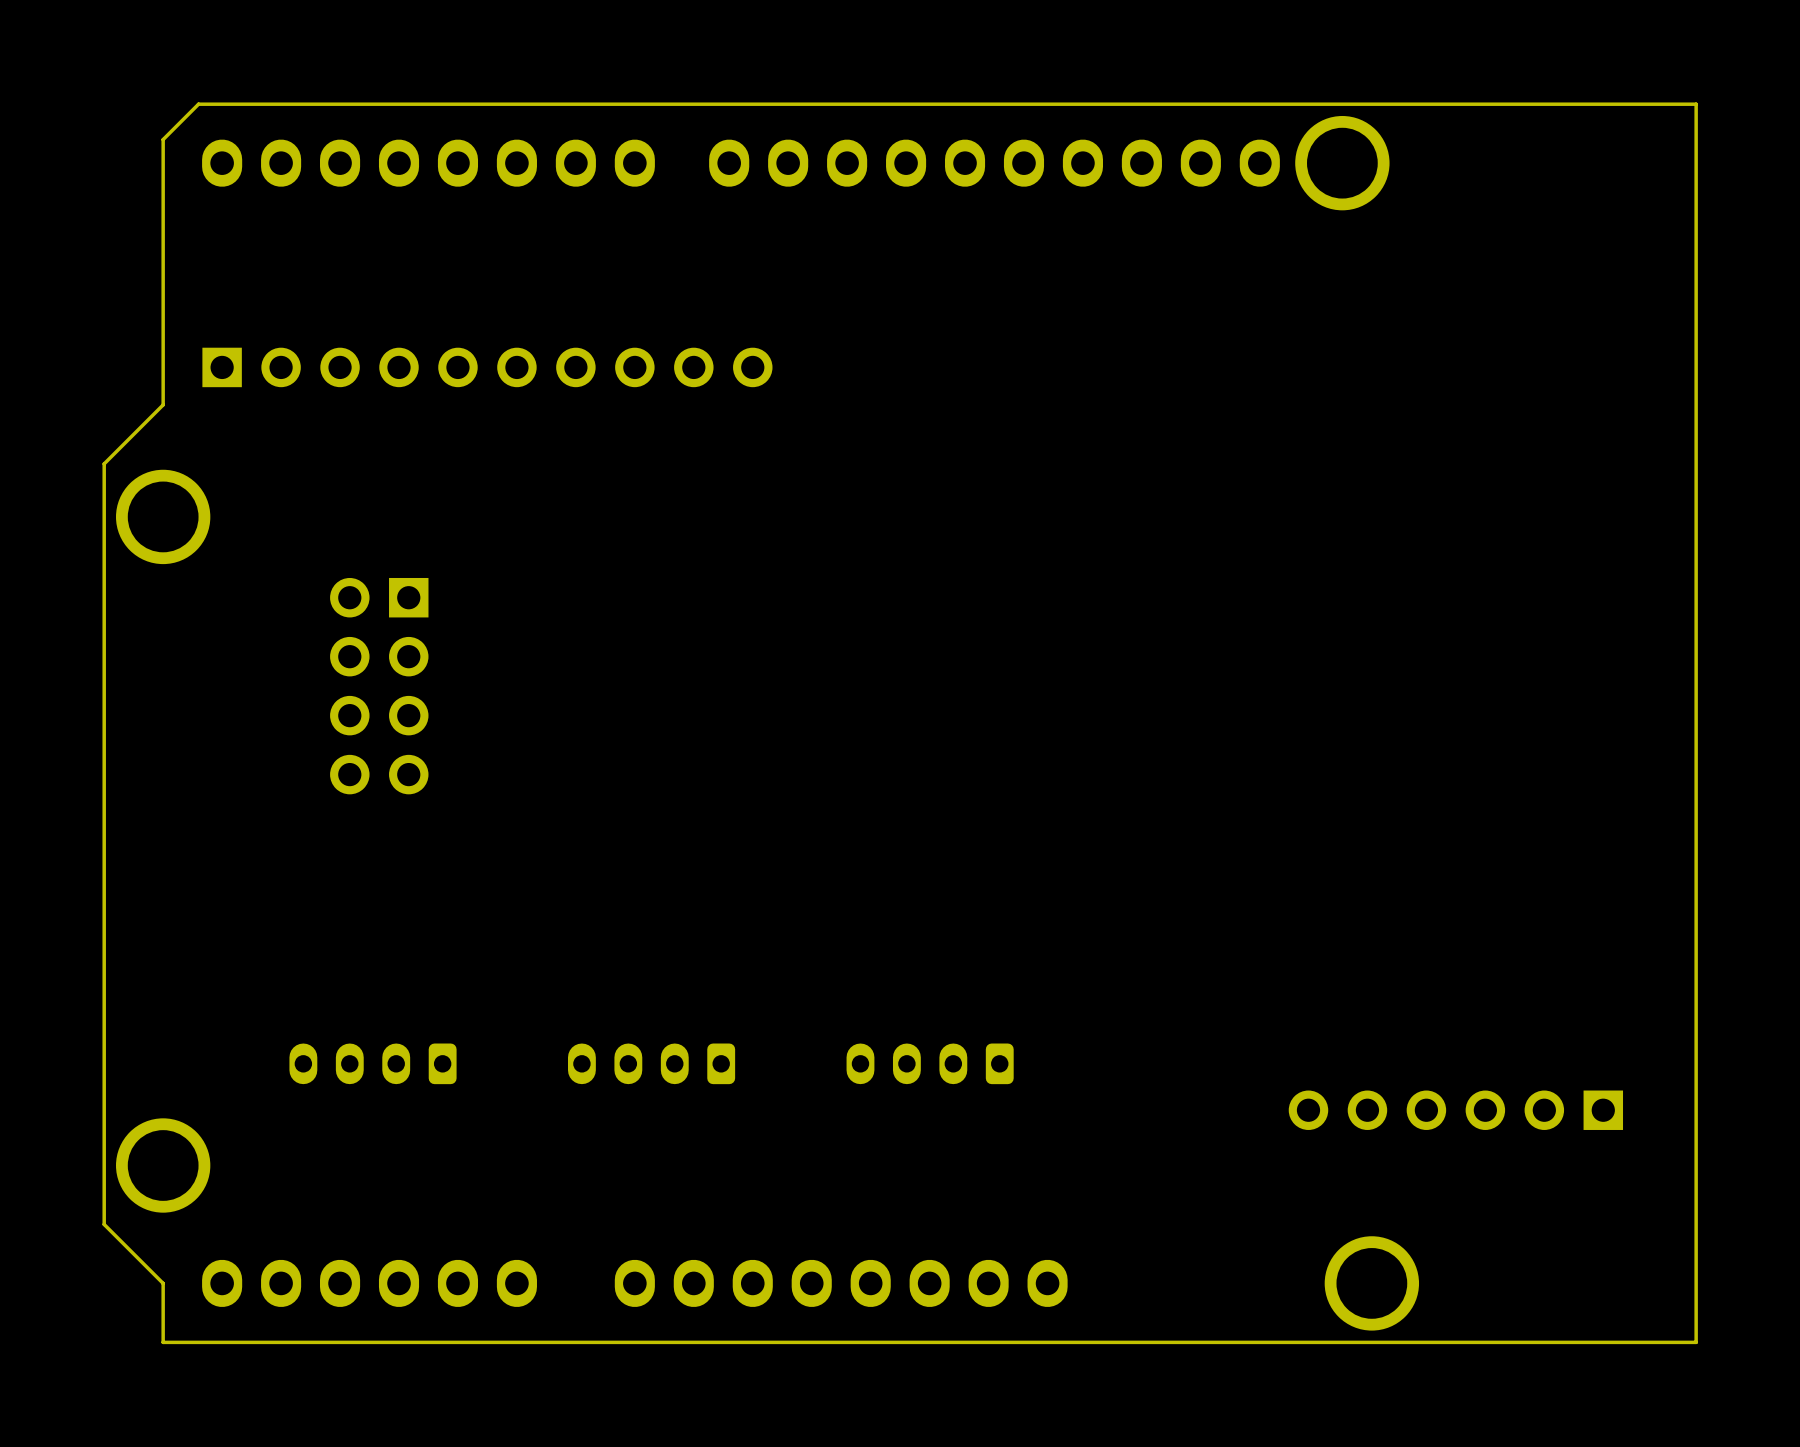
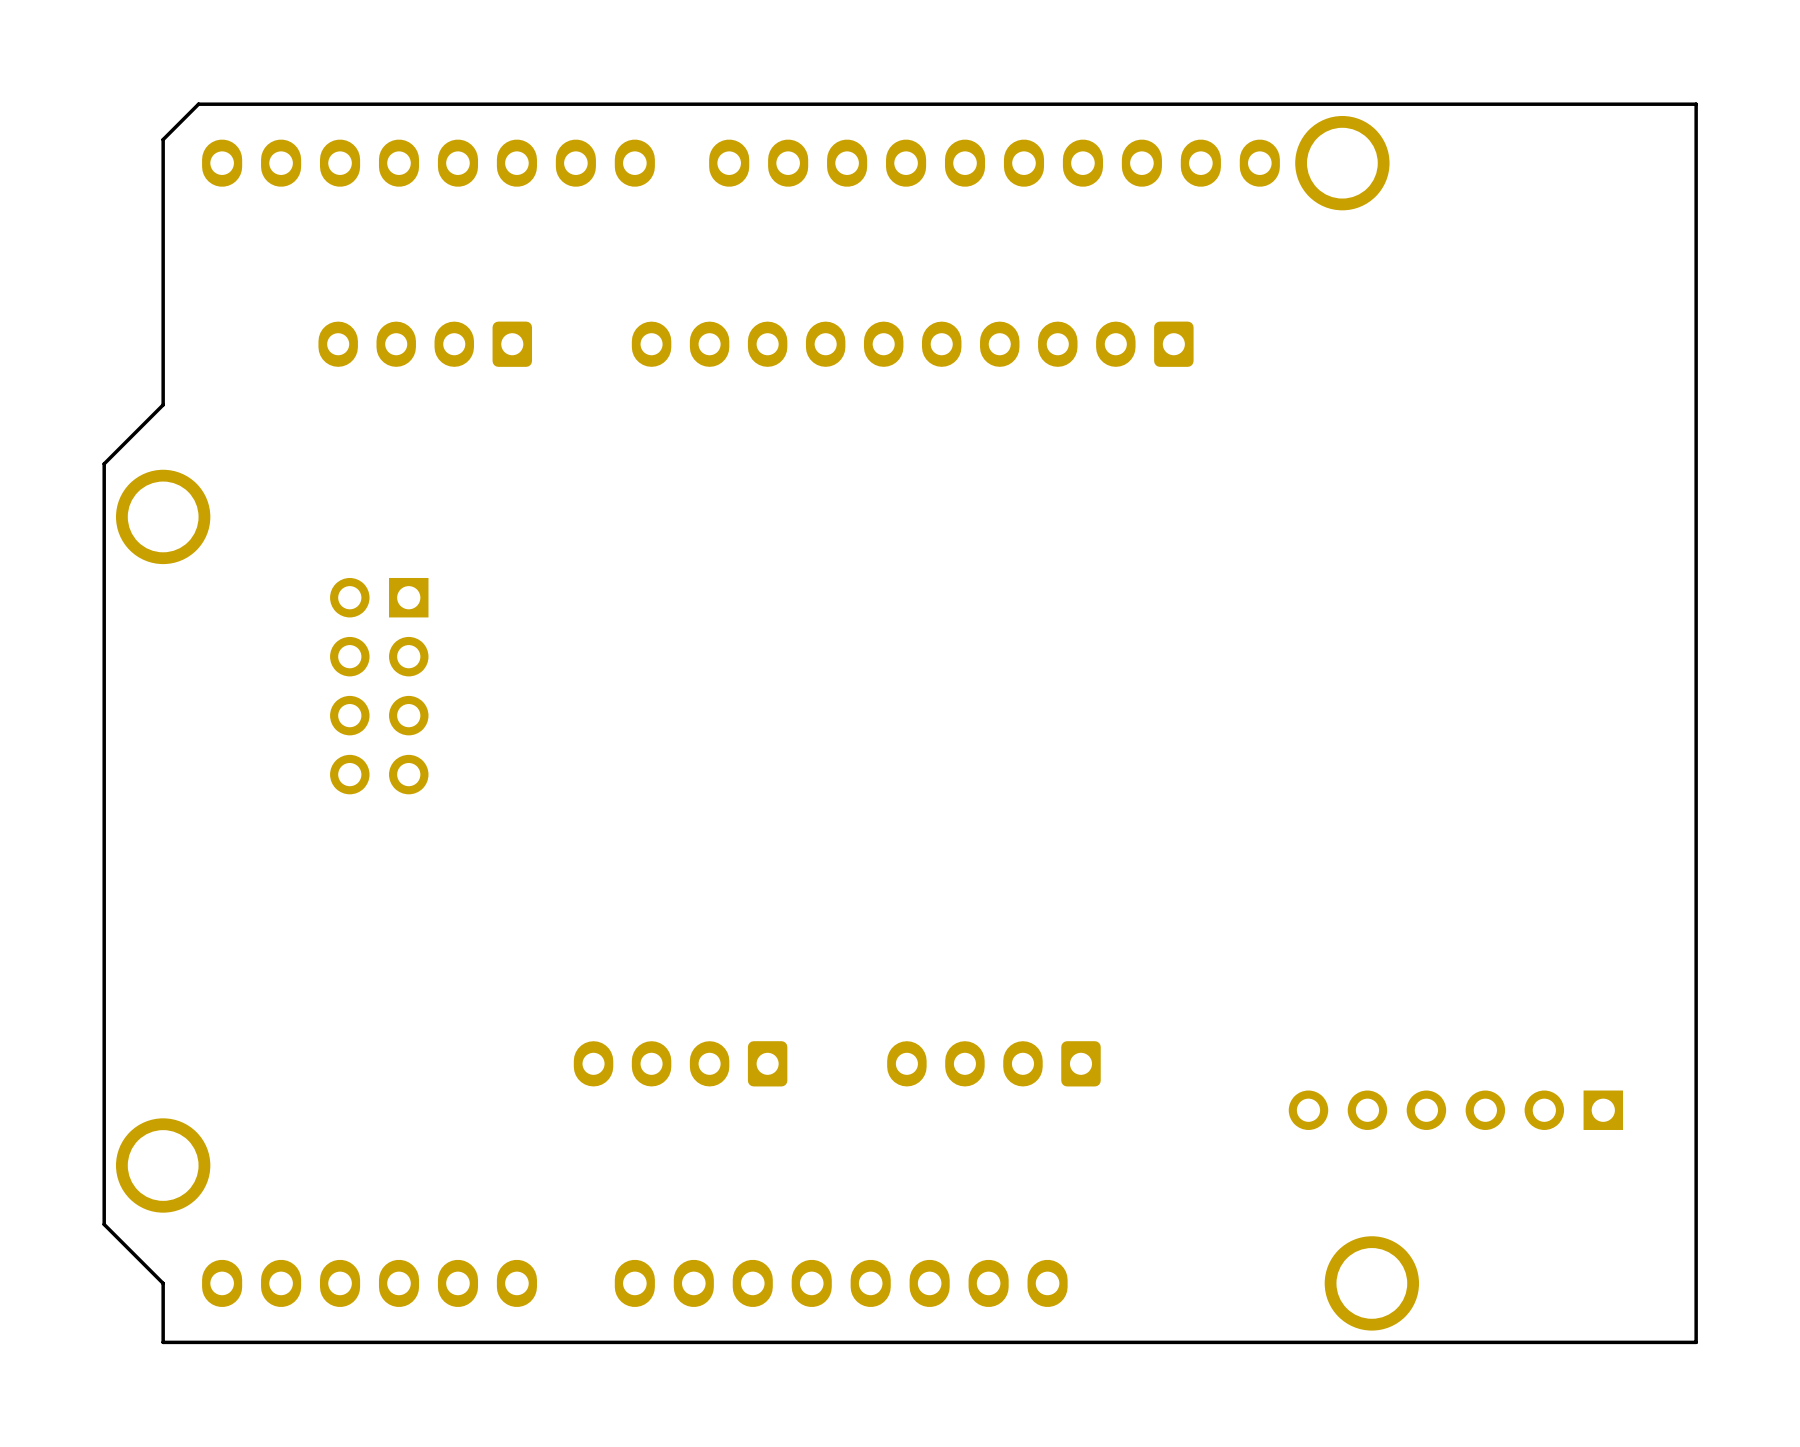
part: none -> (425, 344)
part: none -> (912, 344)
part: (487, 367) -> none
part: (373, 1063) -> none
part: (651, 1063) -> none
part: none -> (680, 1063)
part: (930, 1063) -> none
part: none -> (993, 1063)

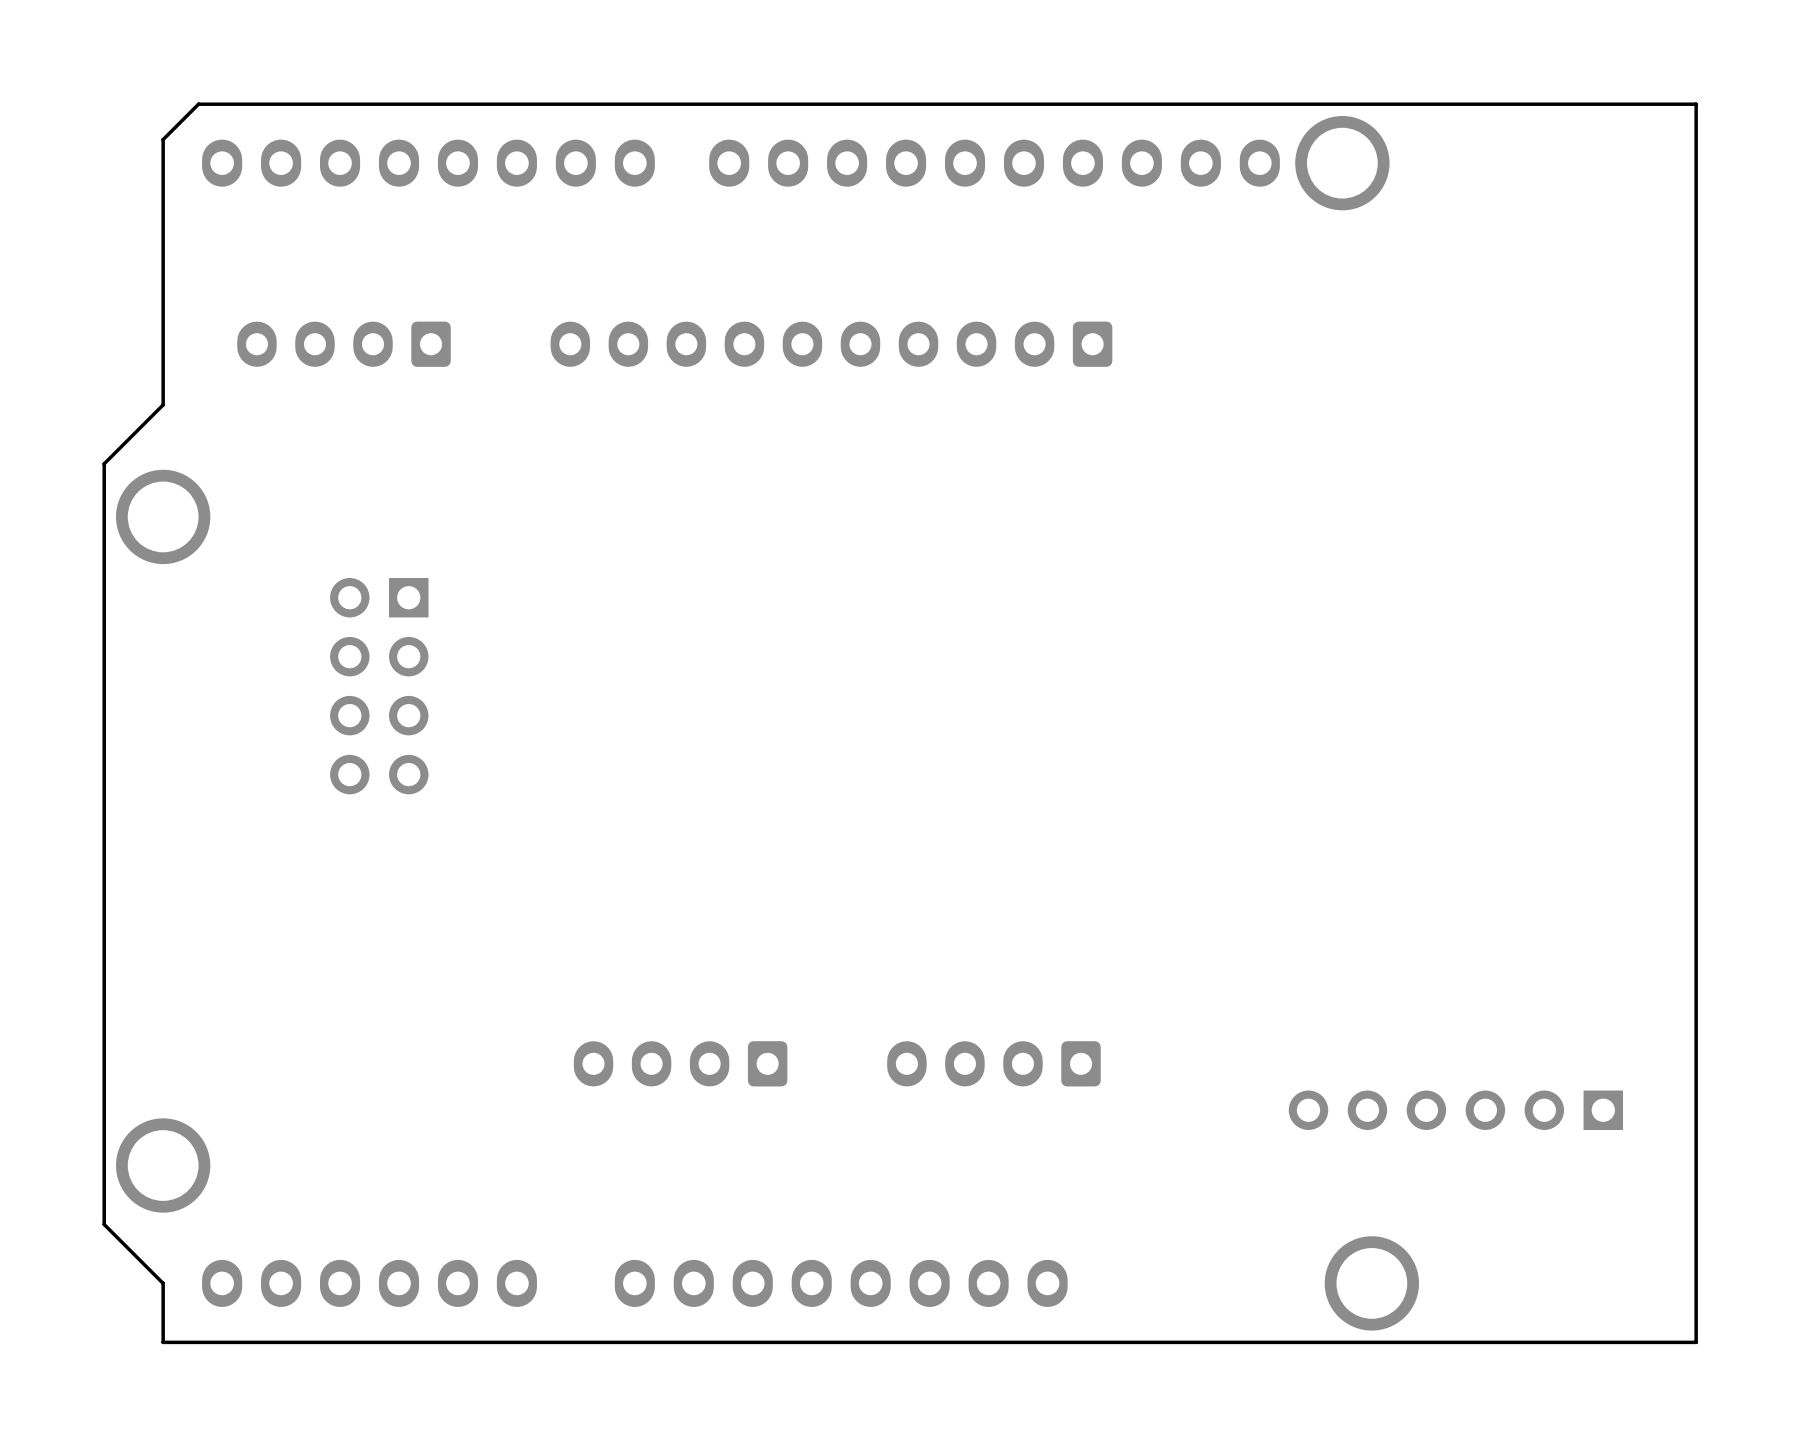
part position: (425, 344) -> (343, 344)
part position: (912, 344) -> (831, 344)

